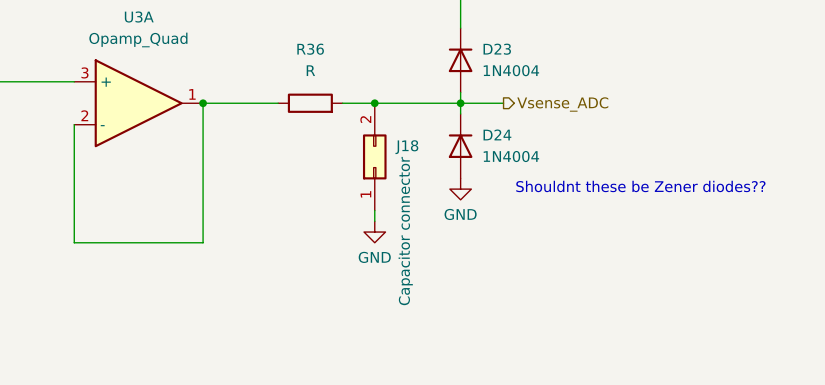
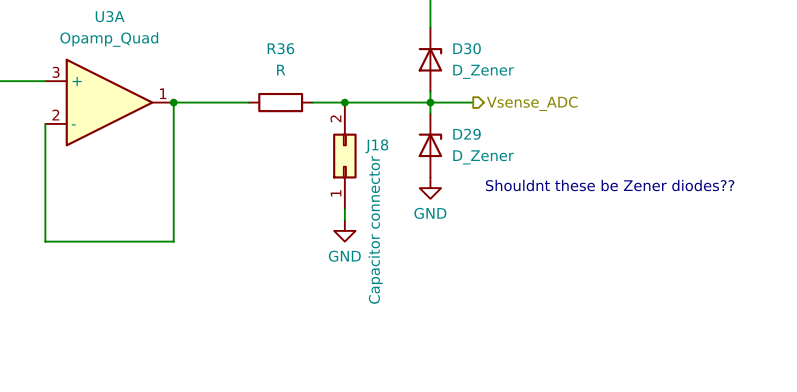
D23: 1N4004 (460, 60) -> none
D30: none -> D_Zener (430, 59)
D24: 1N4004 (460, 146) -> none
D29: none -> D_Zener (430, 145)

